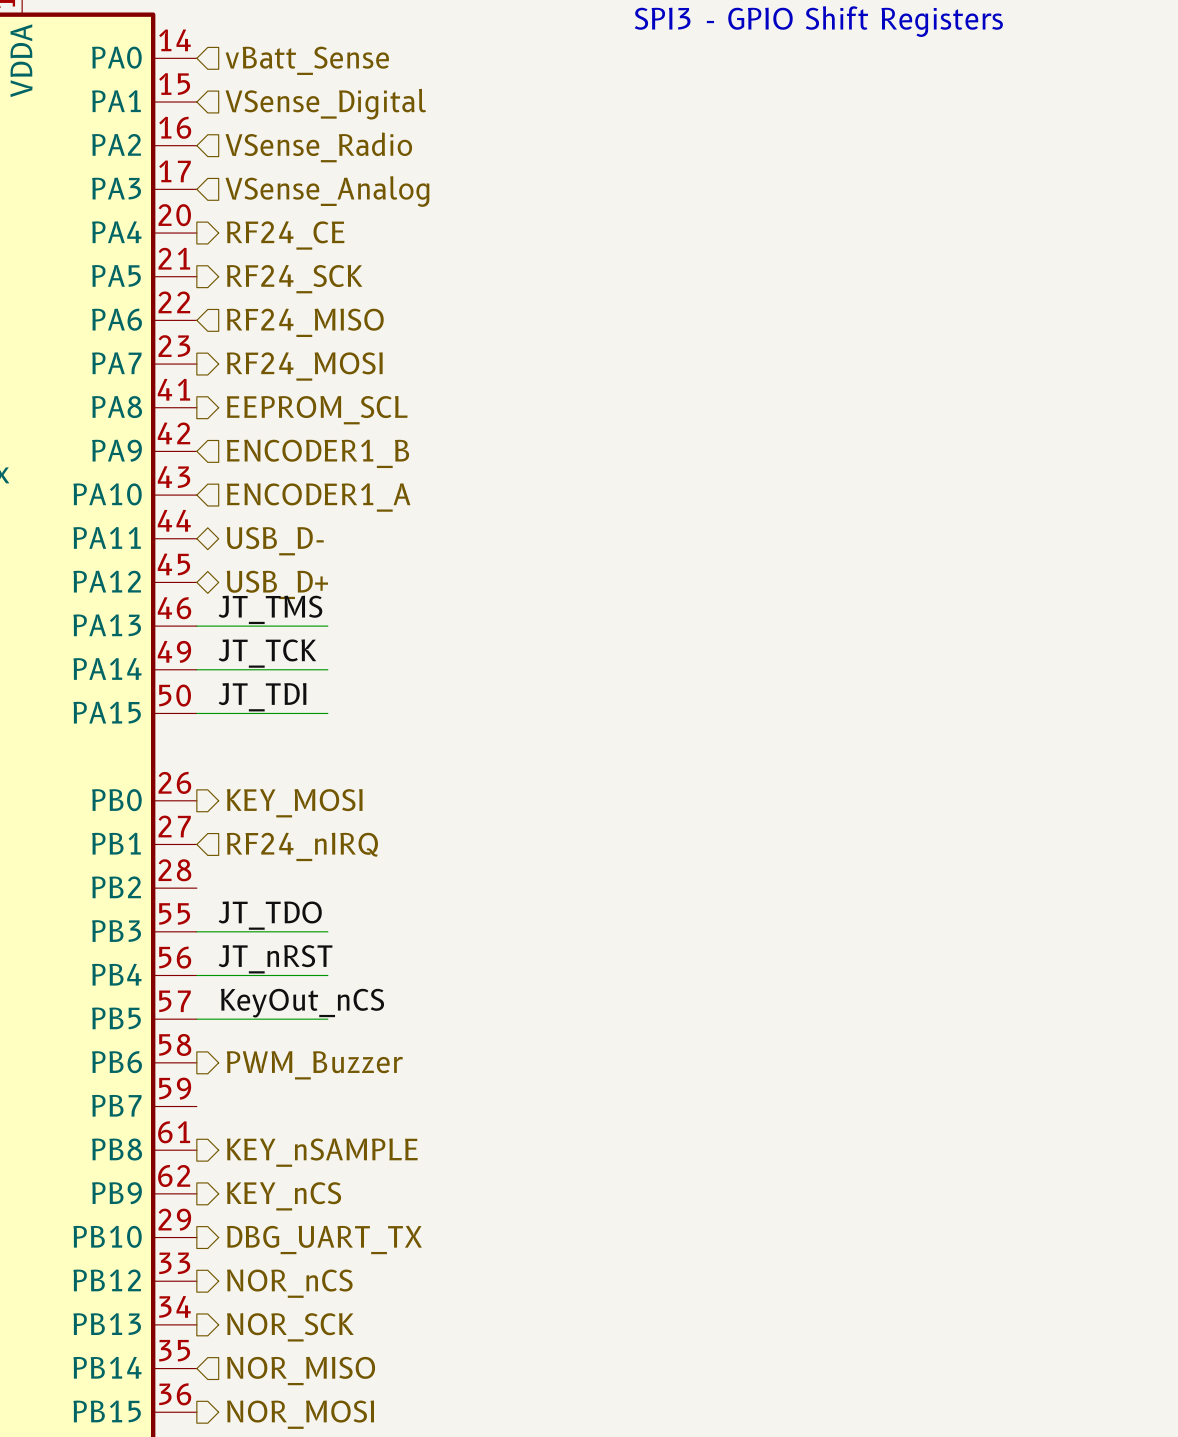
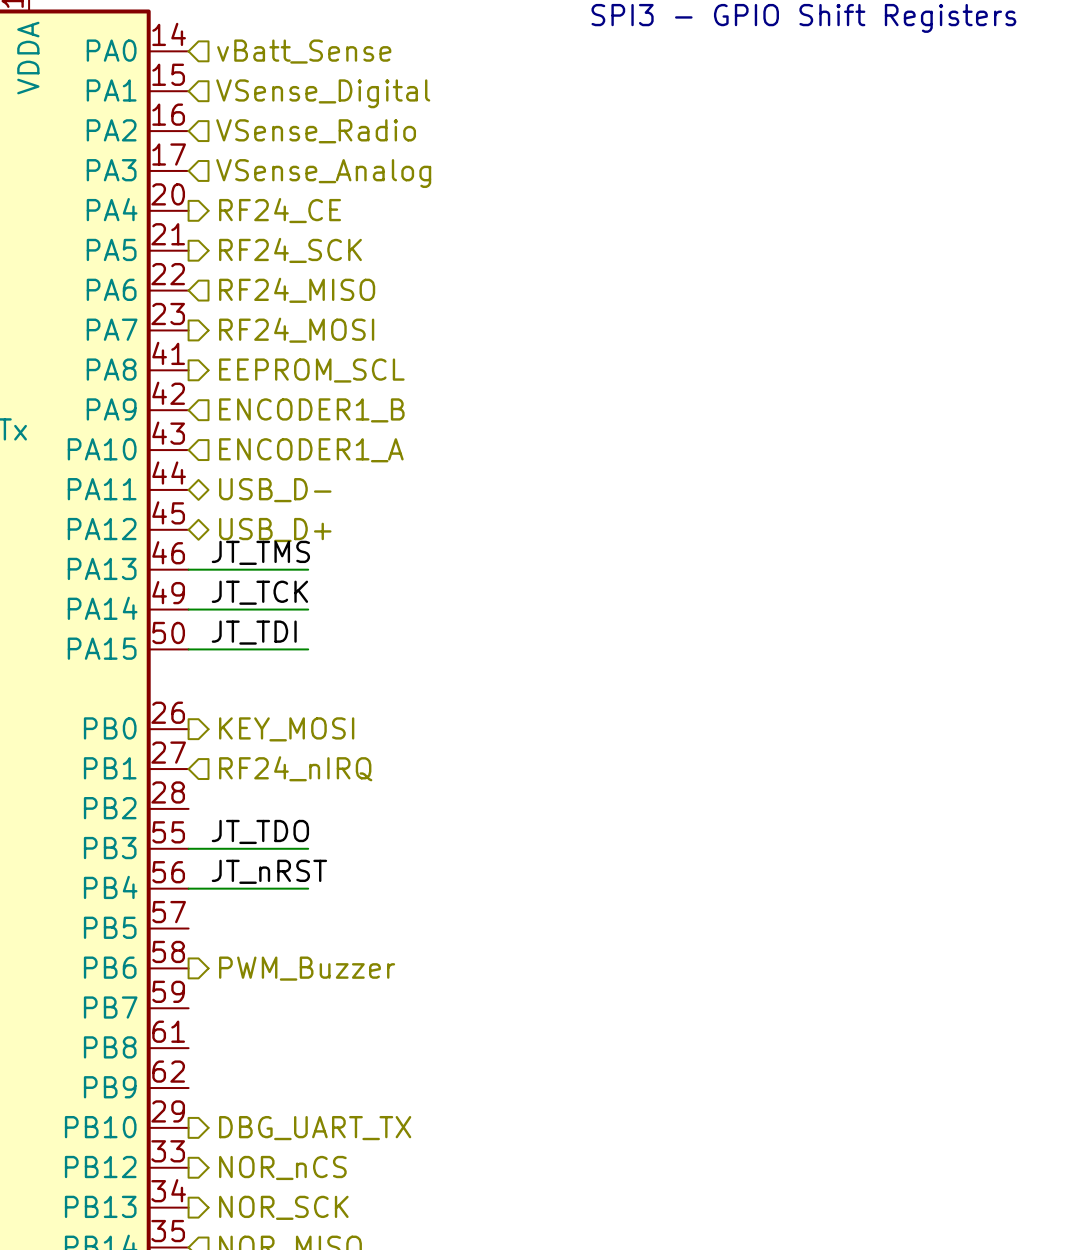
label: KeyOut_nCS (302, 1003) -> none
wire: (196, 1019) (327, 1019) -> none
hierarchical label: KEY_nSAMPLE (322, 1152) -> none
hierarchical label: KEY_nCS (283, 1196) -> none

